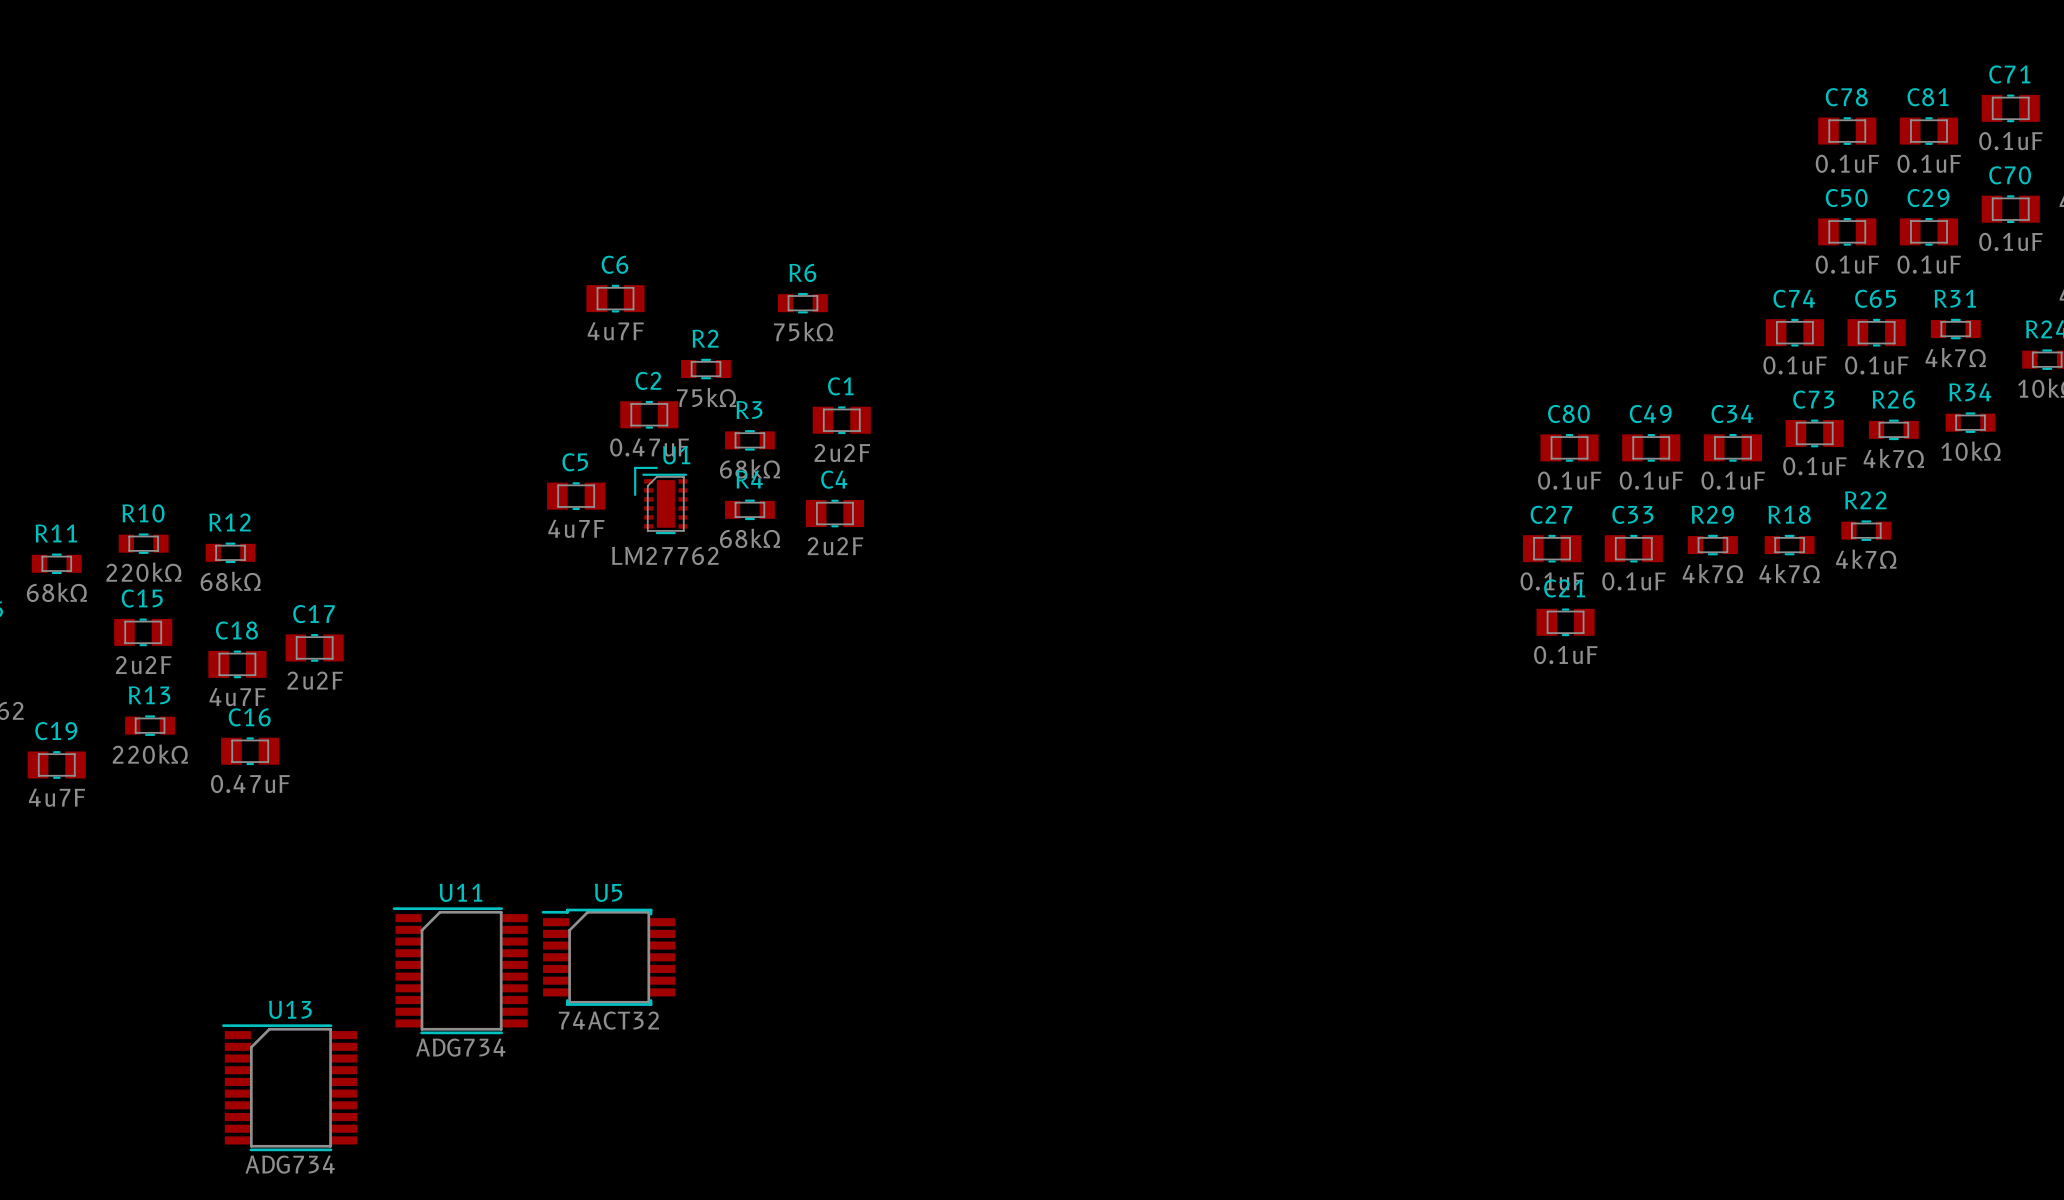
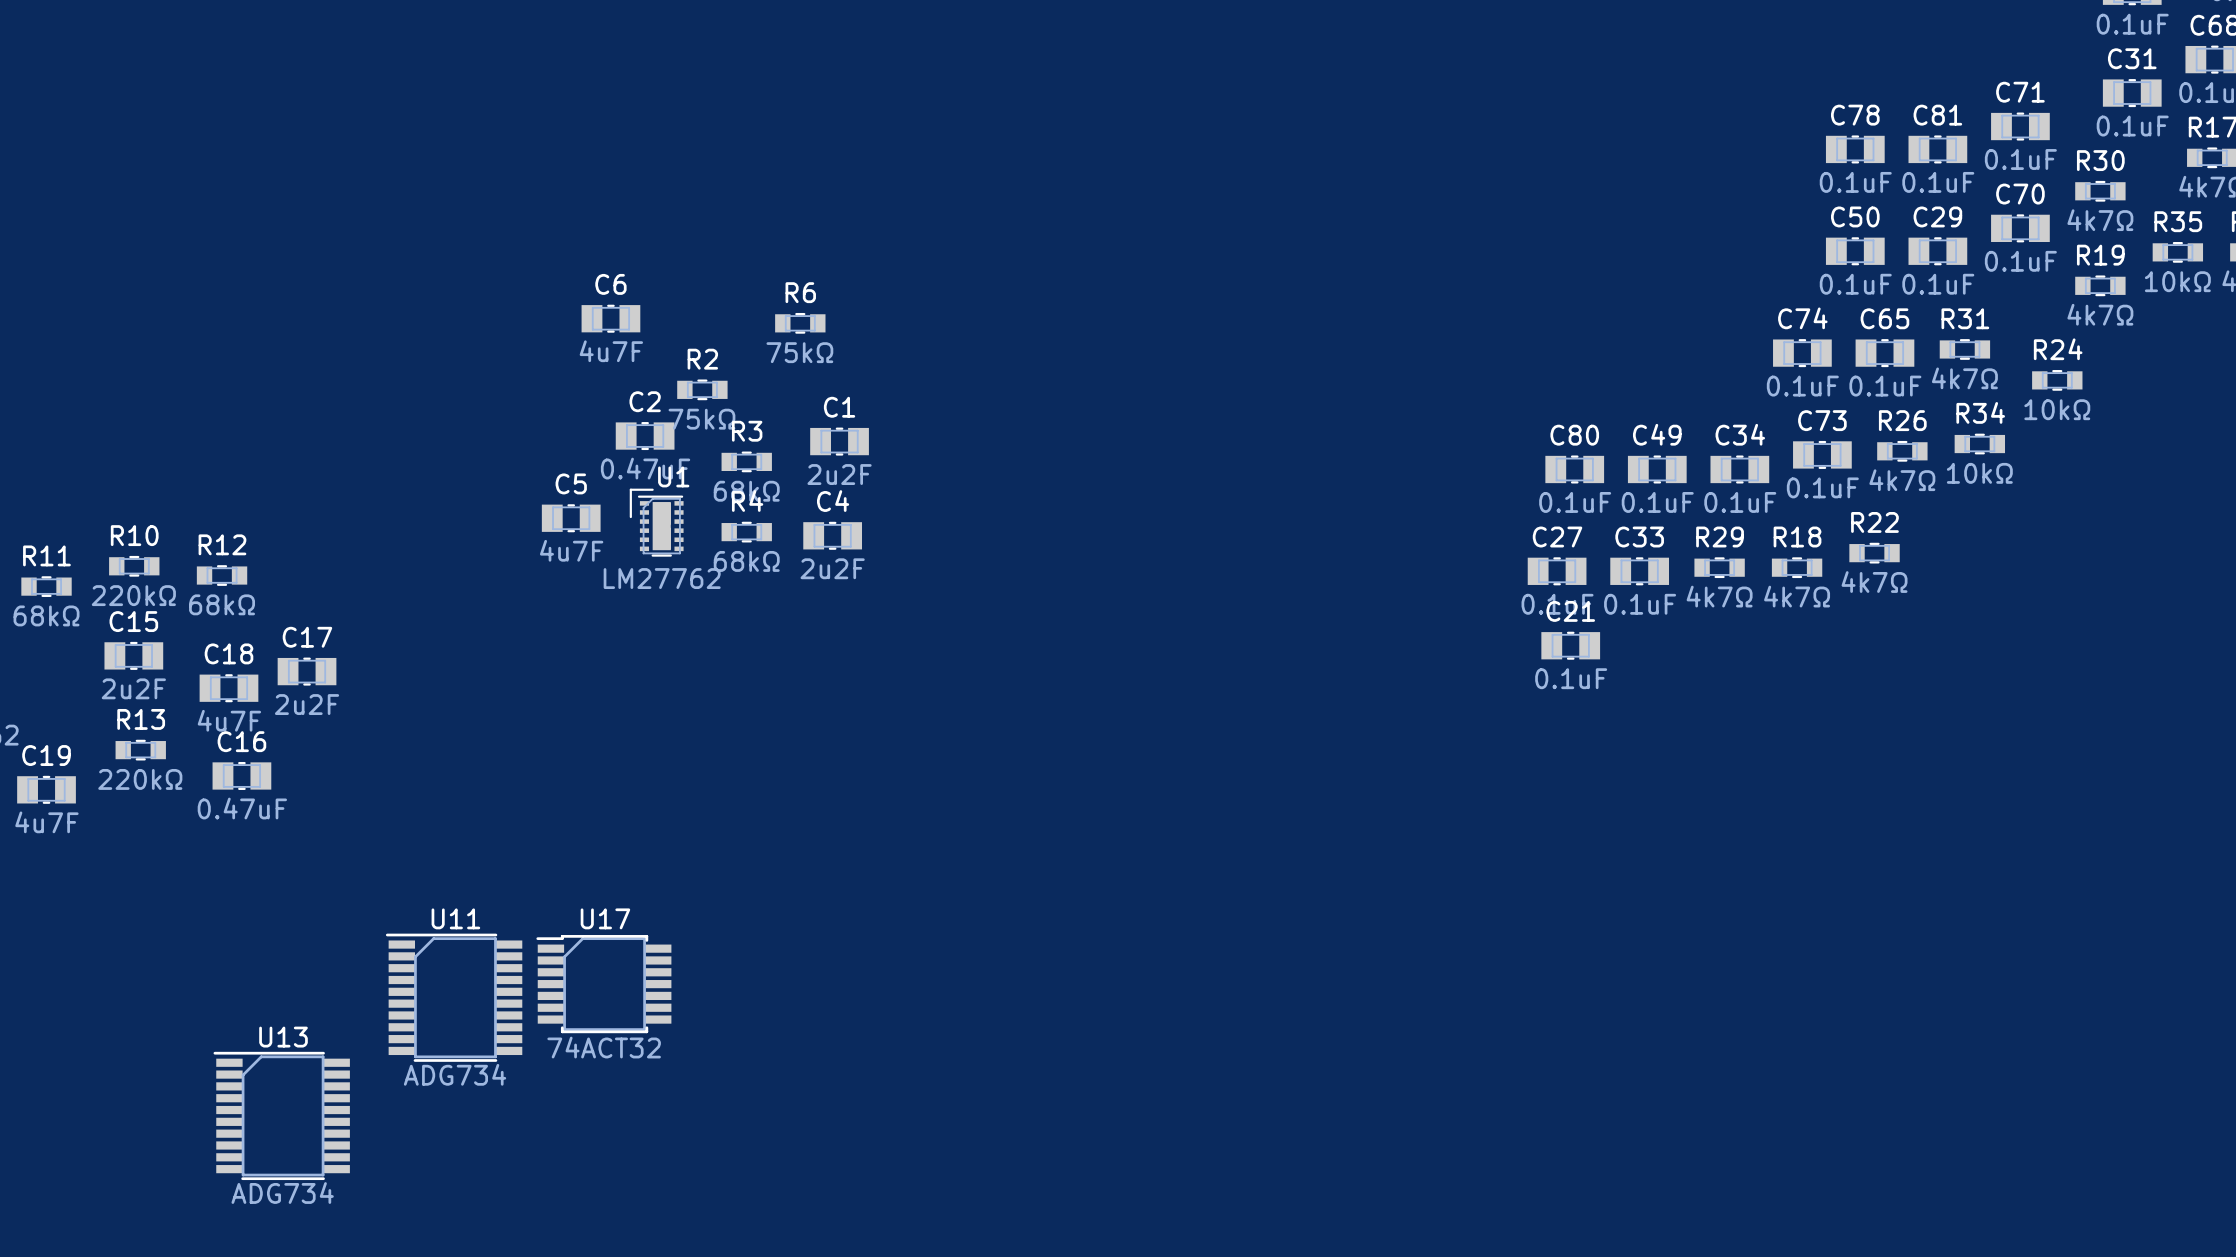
U5 name: U5 (608, 892) -> U17 (605, 918)

